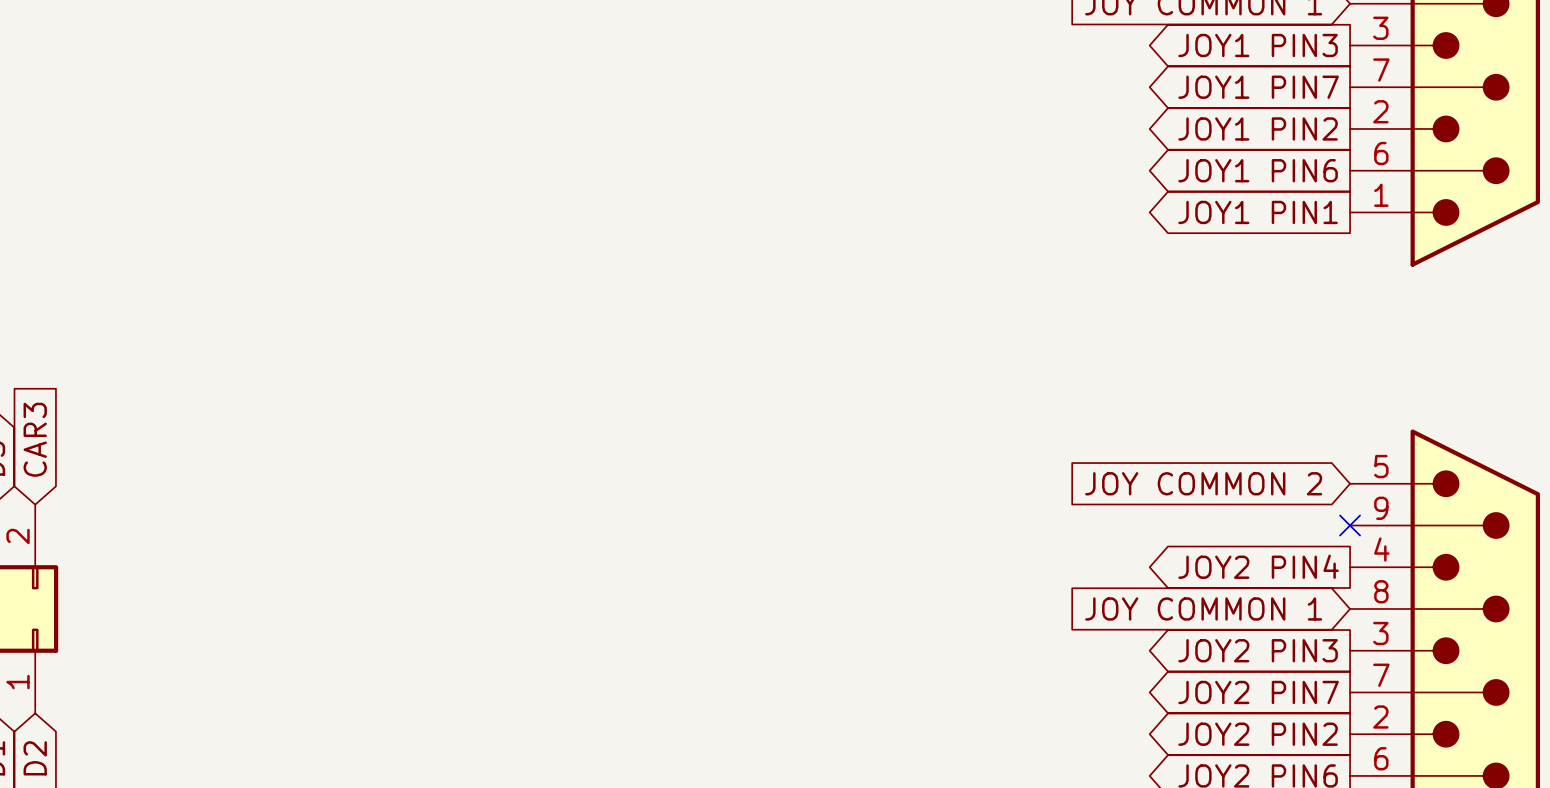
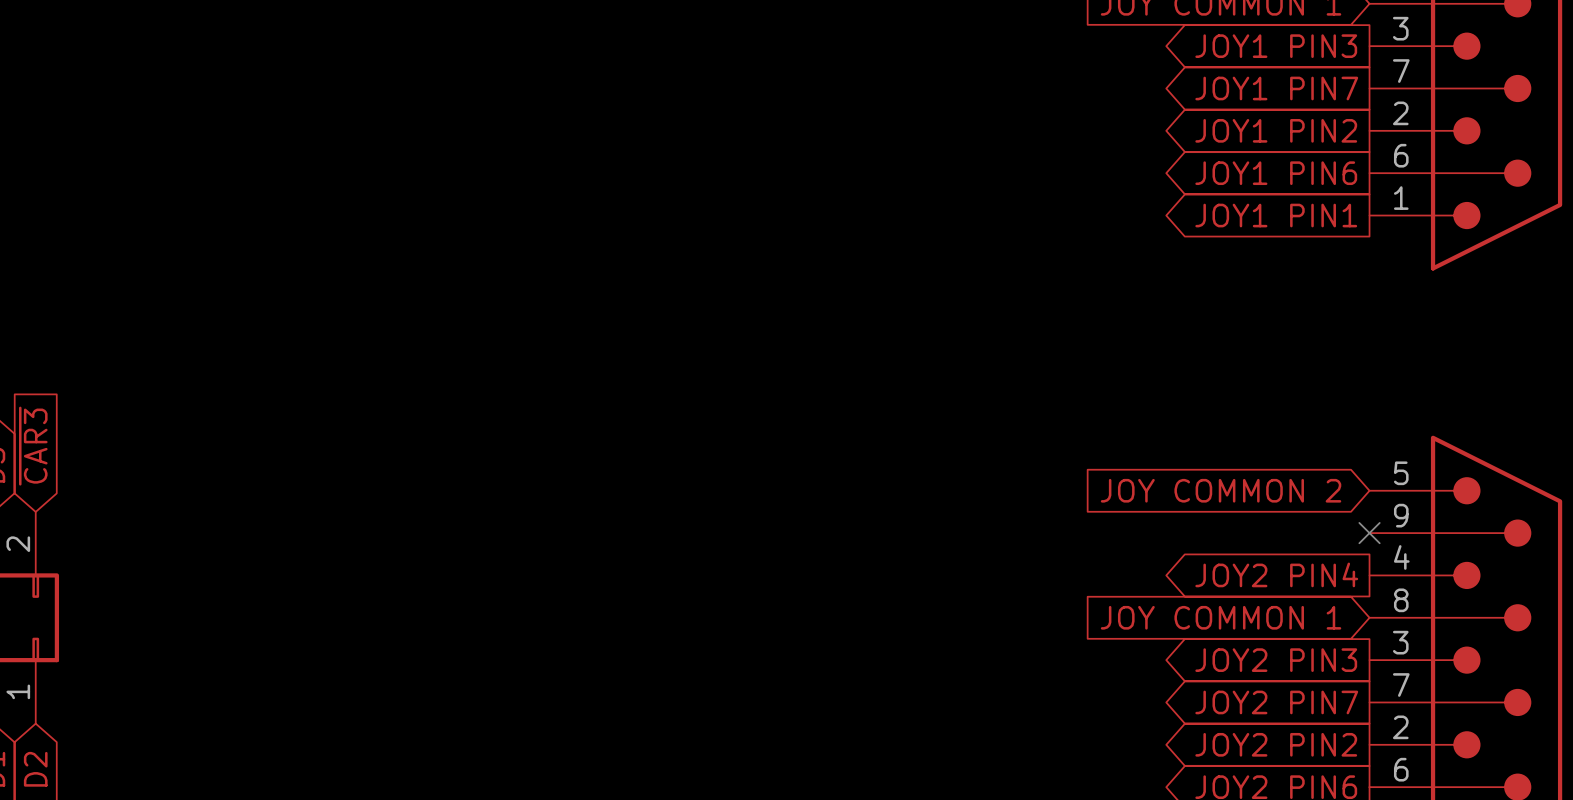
global label: CAR3 (35, 439) -> ~{CAR3} (33, 446)

